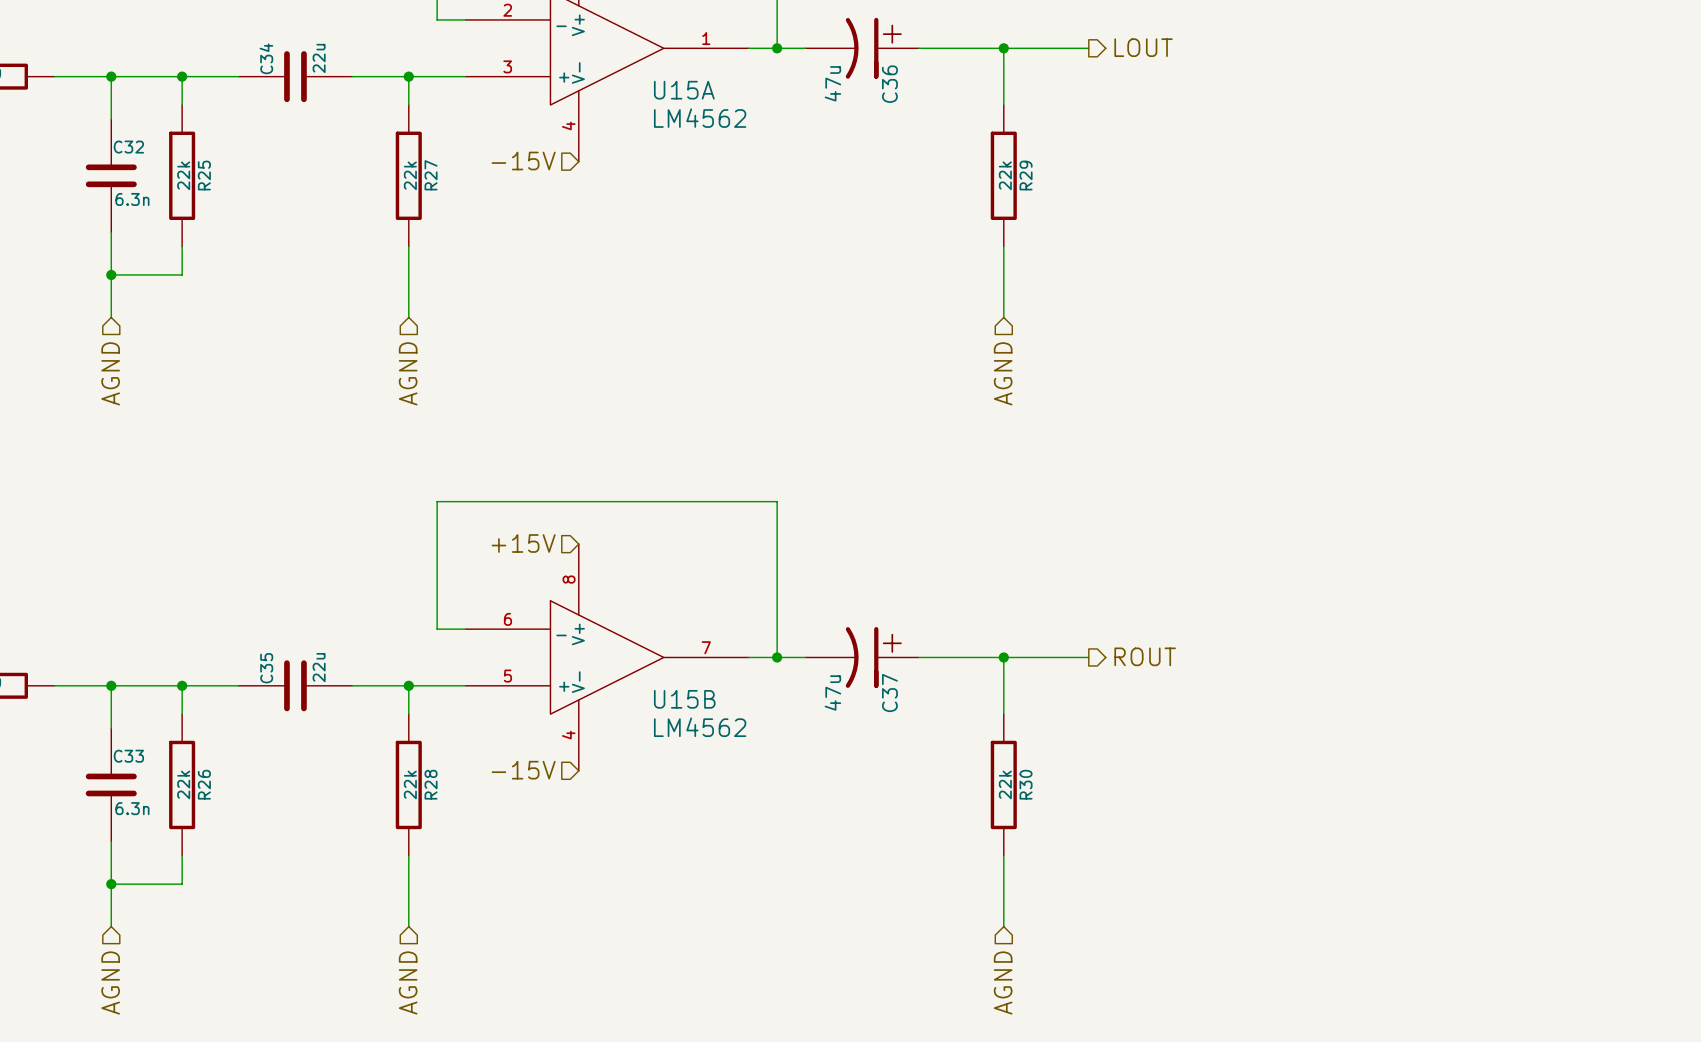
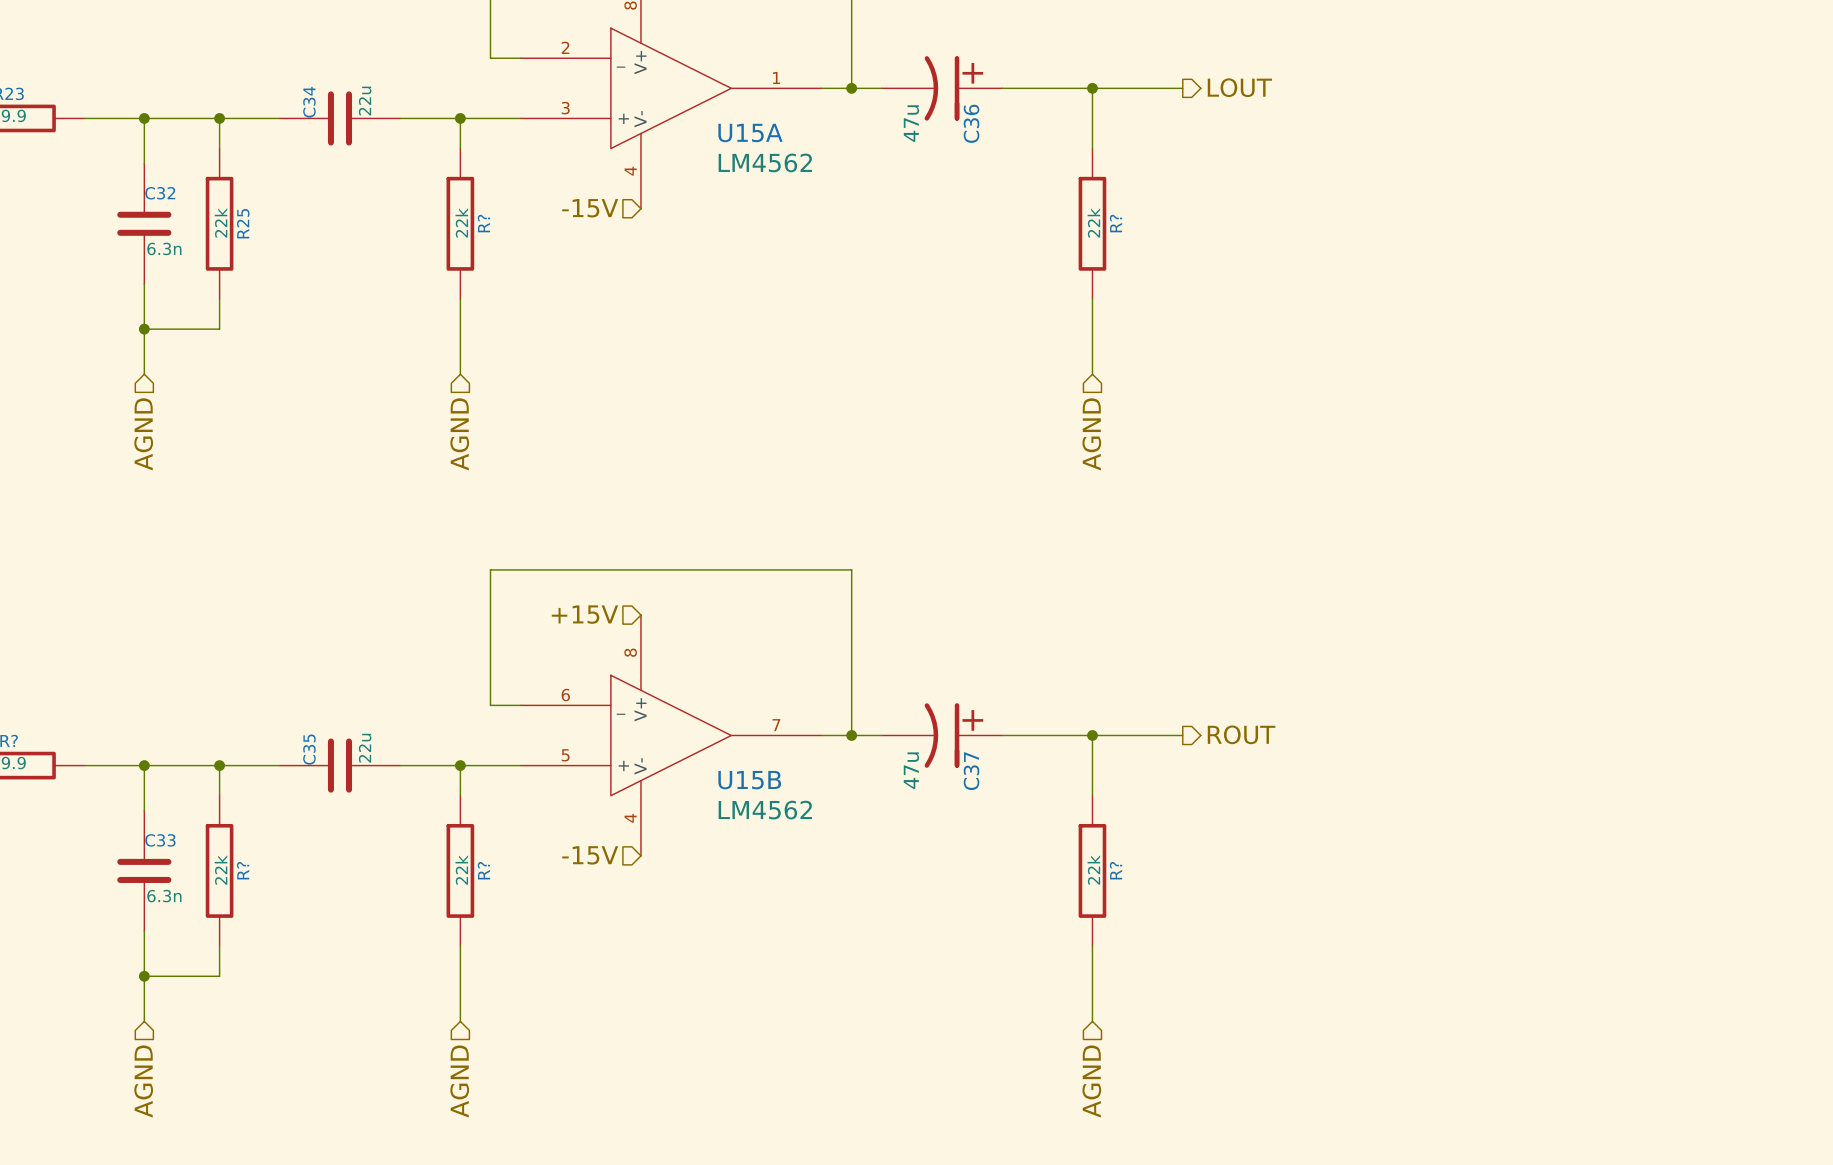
R27 name: R27 (431, 175) -> R? (483, 223)
R29 name: R29 (1026, 175) -> R? (1115, 223)
R26 name: R26 (204, 784) -> R? (243, 870)
R28 name: R28 (431, 784) -> R? (483, 870)
R30 name: R30 (1026, 784) -> R? (1115, 870)

